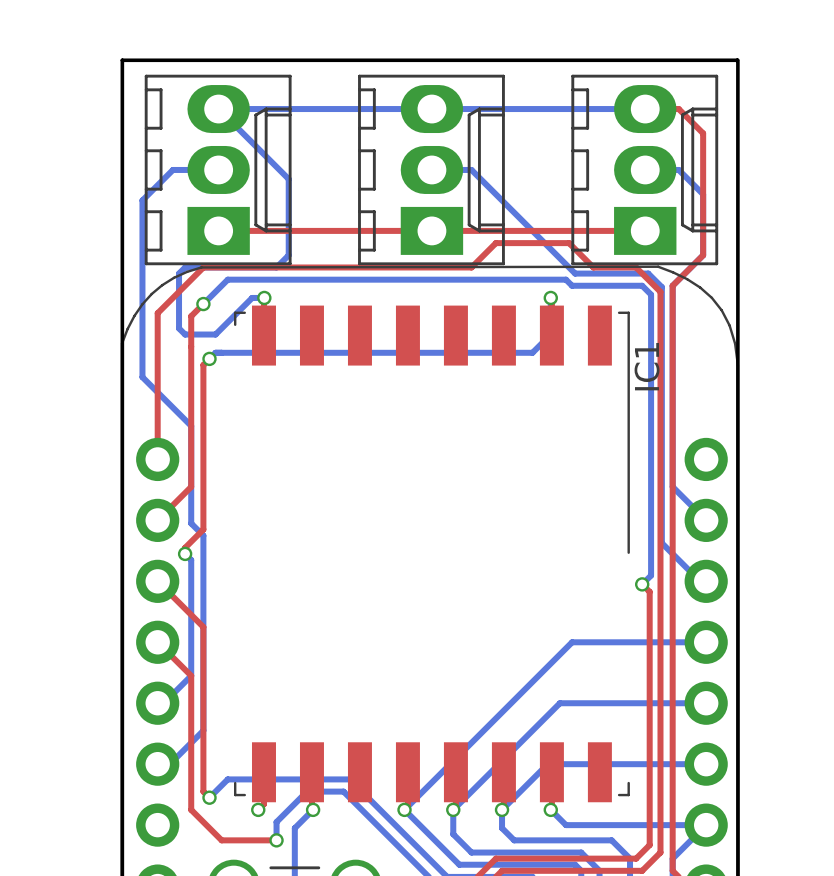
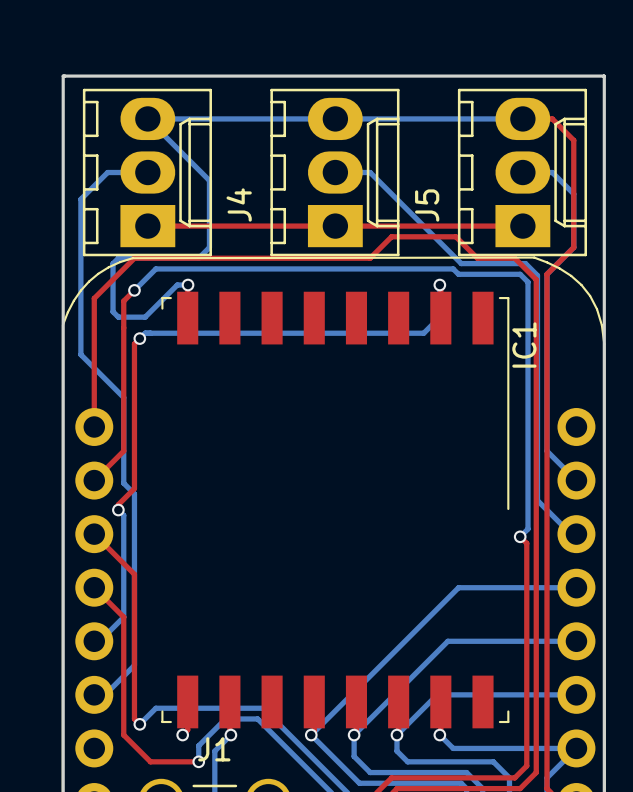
J4 name: none -> J4 (239, 204)
J5 name: none -> J5 (427, 205)
J1 name: none -> J1 (214, 749)

